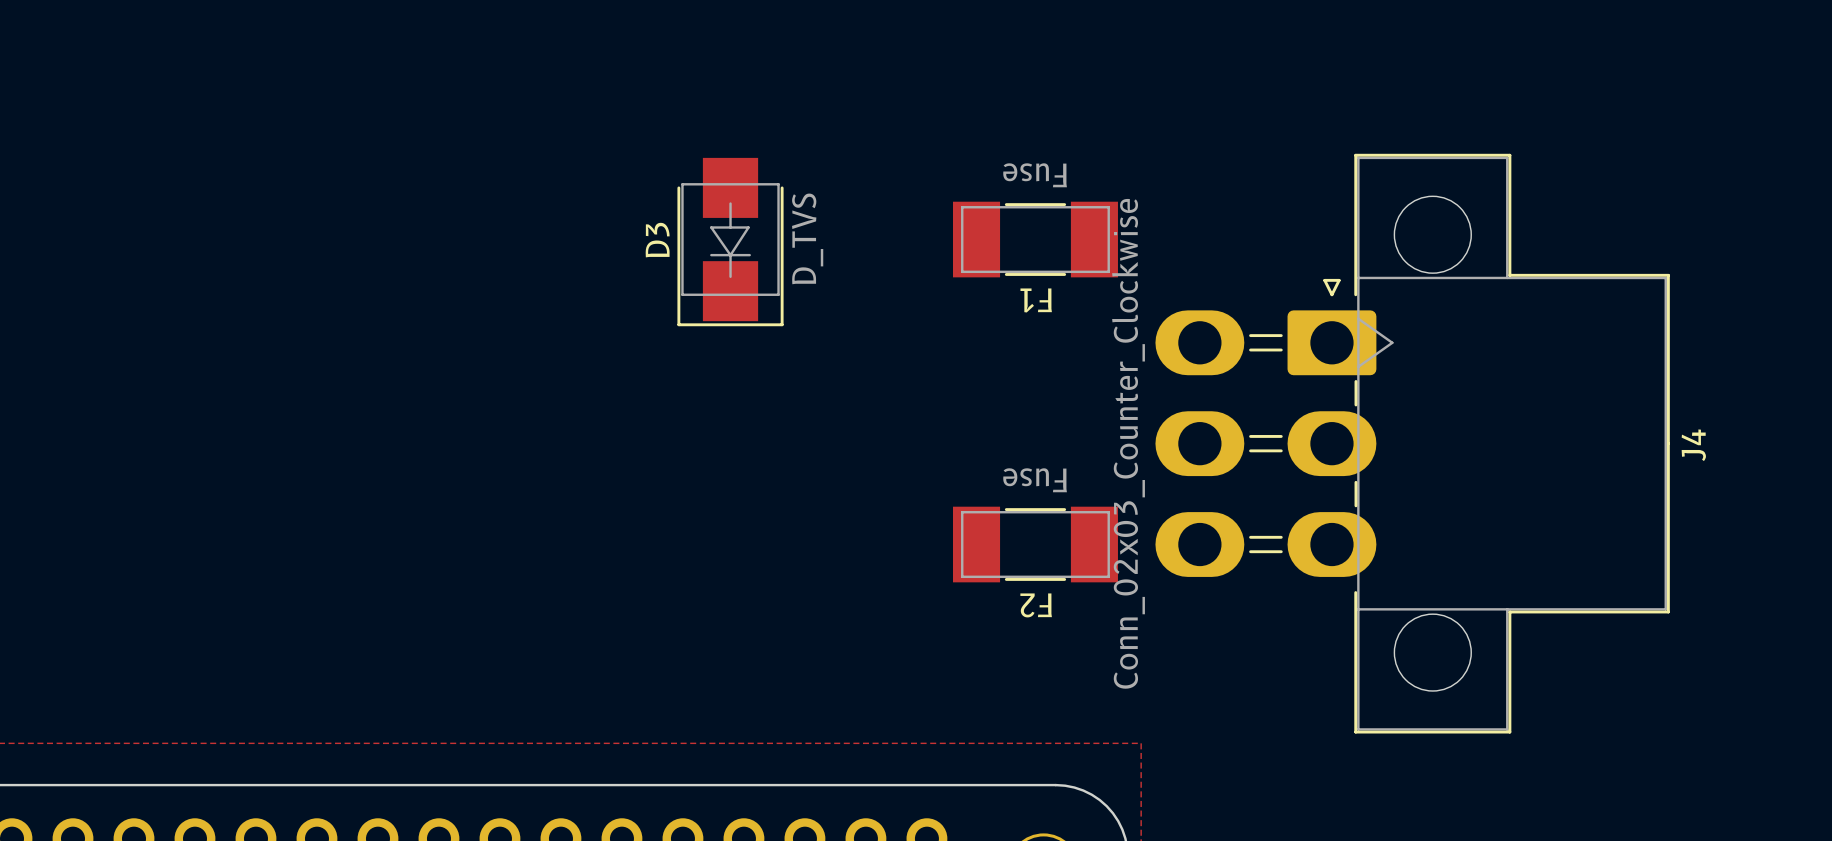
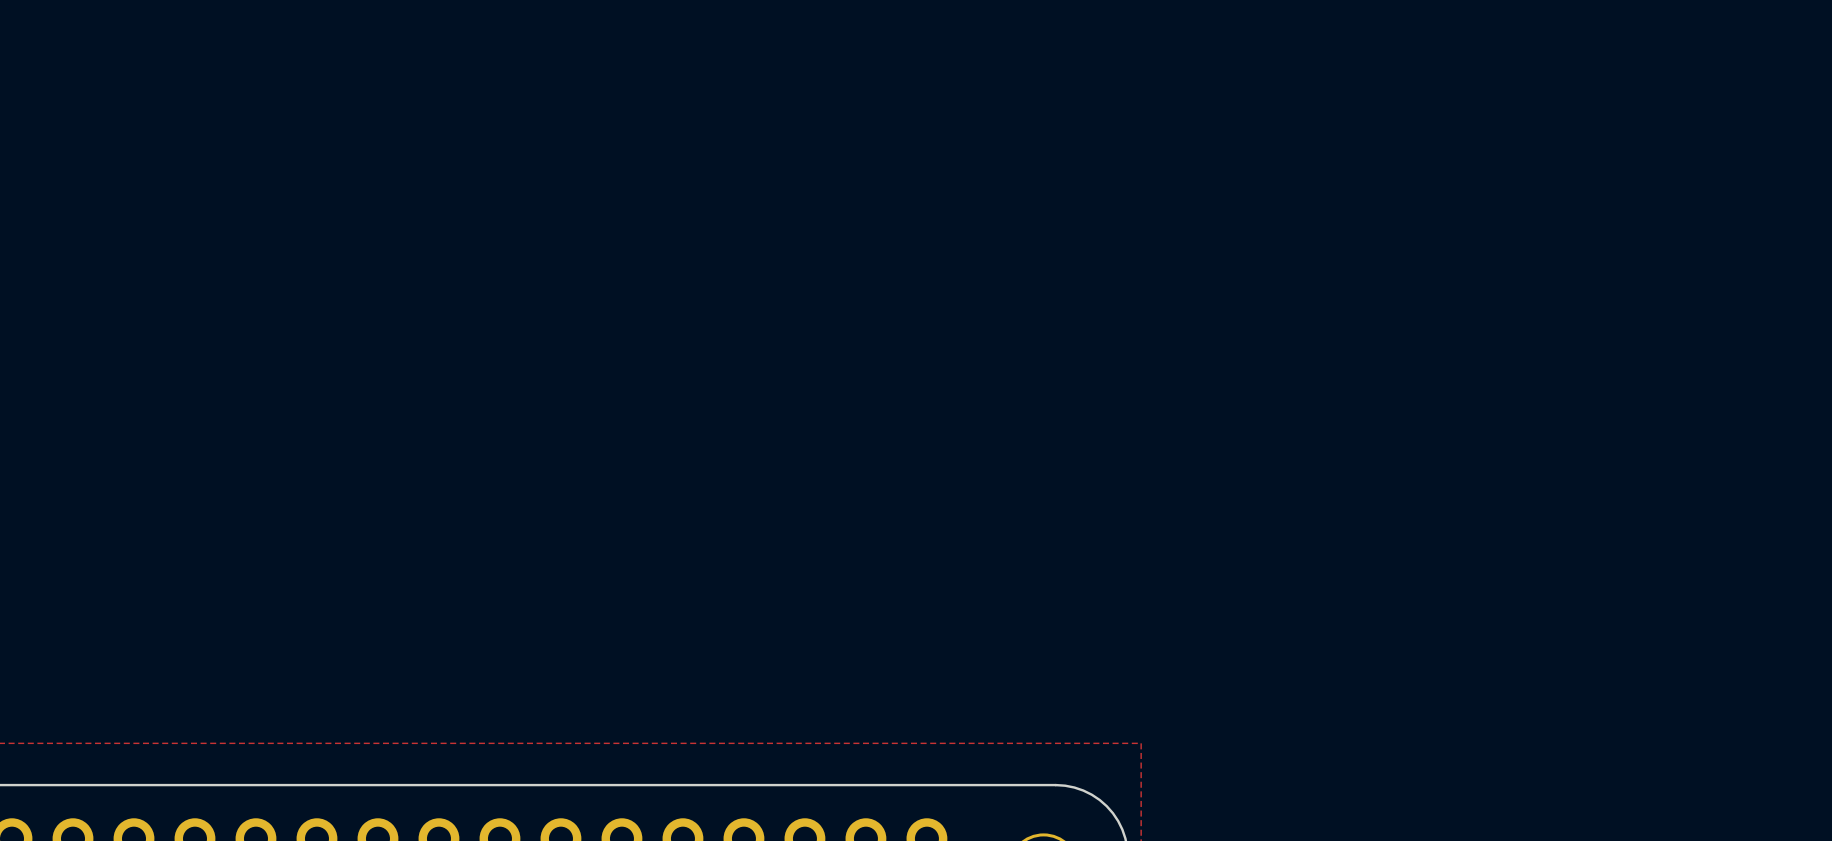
F1: Fuse (1035, 239) -> none
D3: D_TVS (730, 242) -> none
J4: Conn_02x03_Counter_Clockwise (1412, 443) -> none
F2: Fuse (1035, 544) -> none

